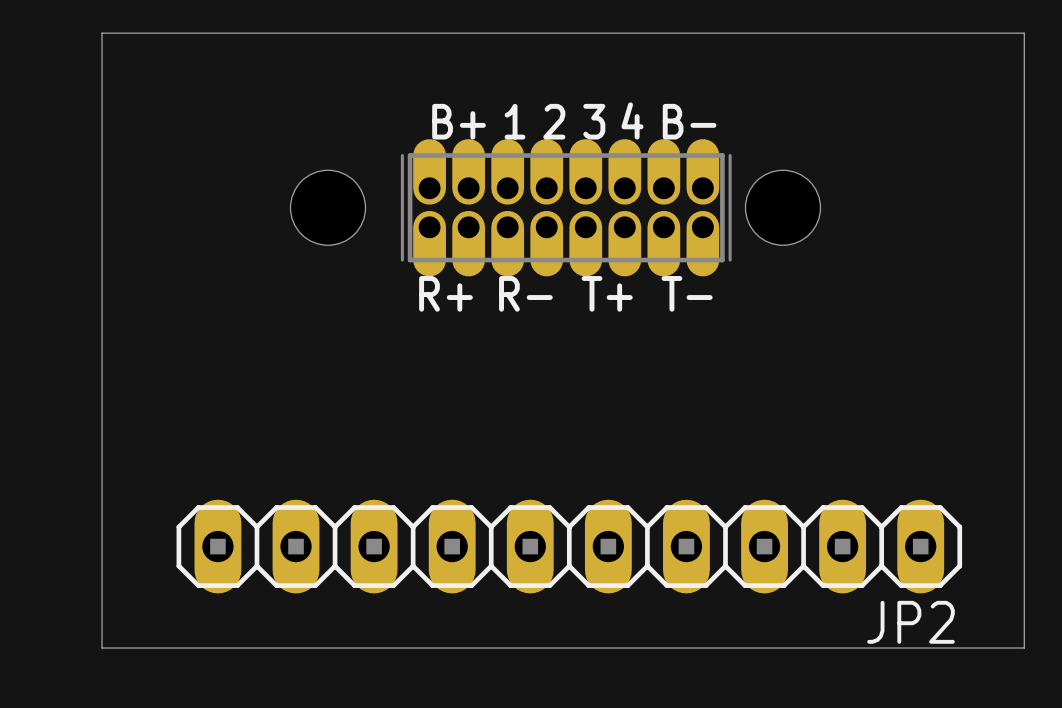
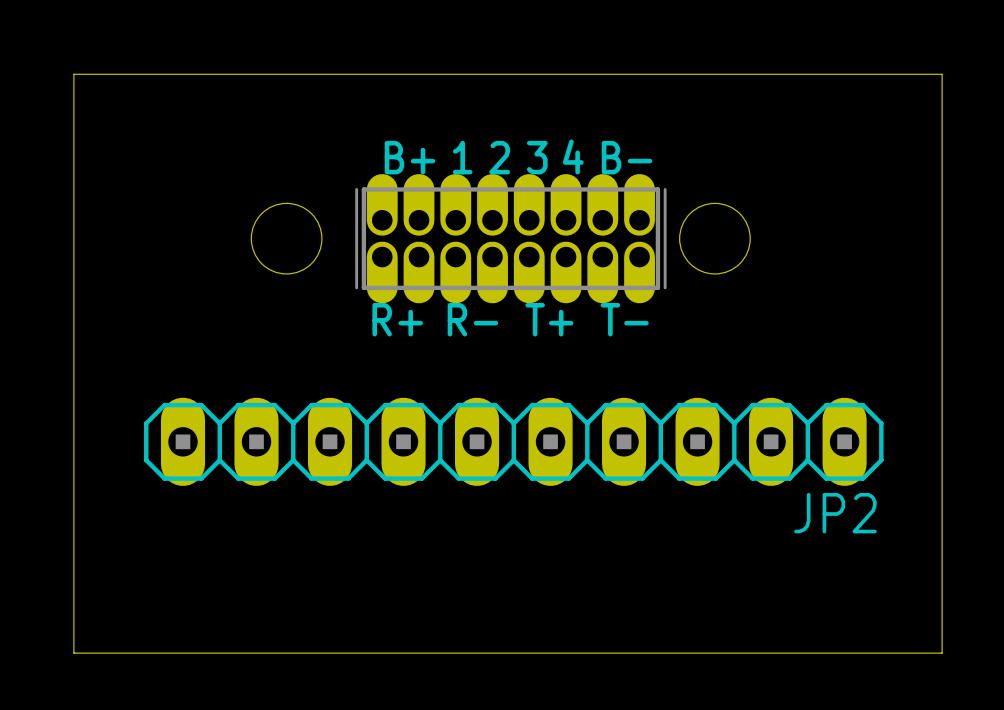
JP2 position: (569, 546) -> (513, 441)

